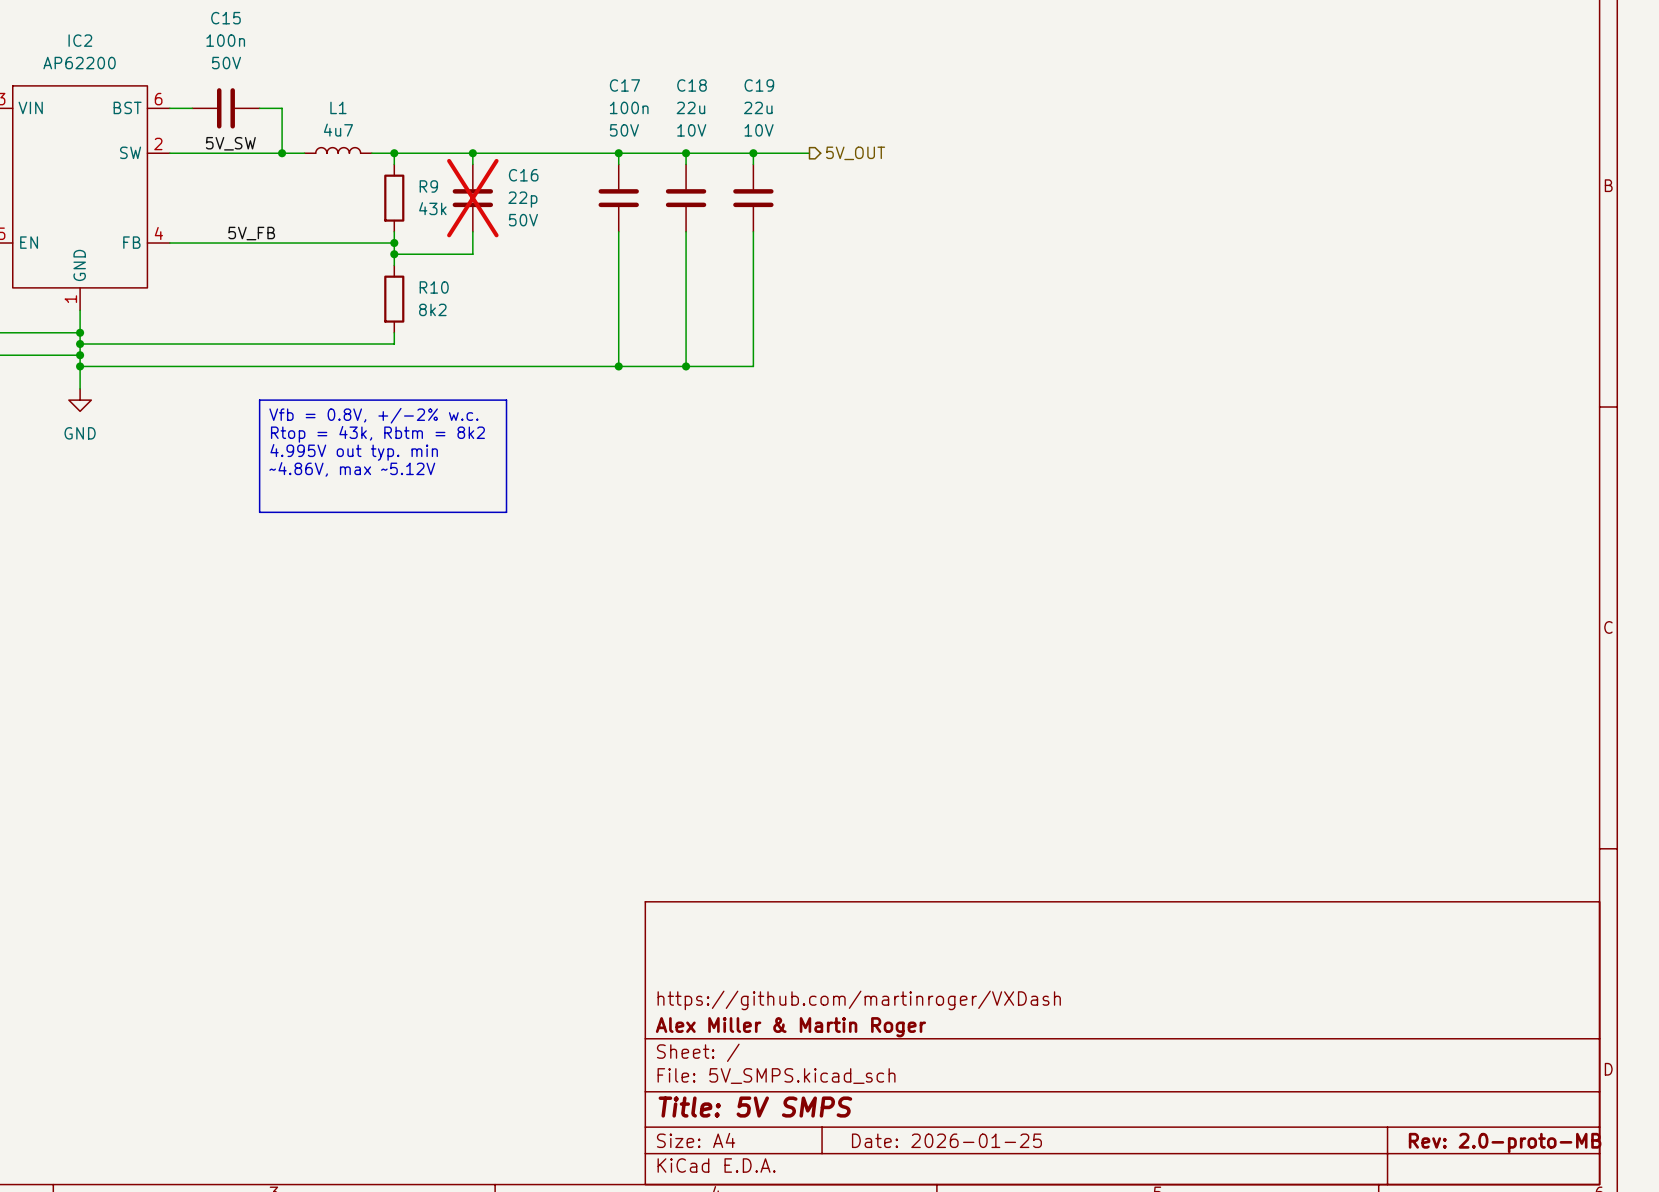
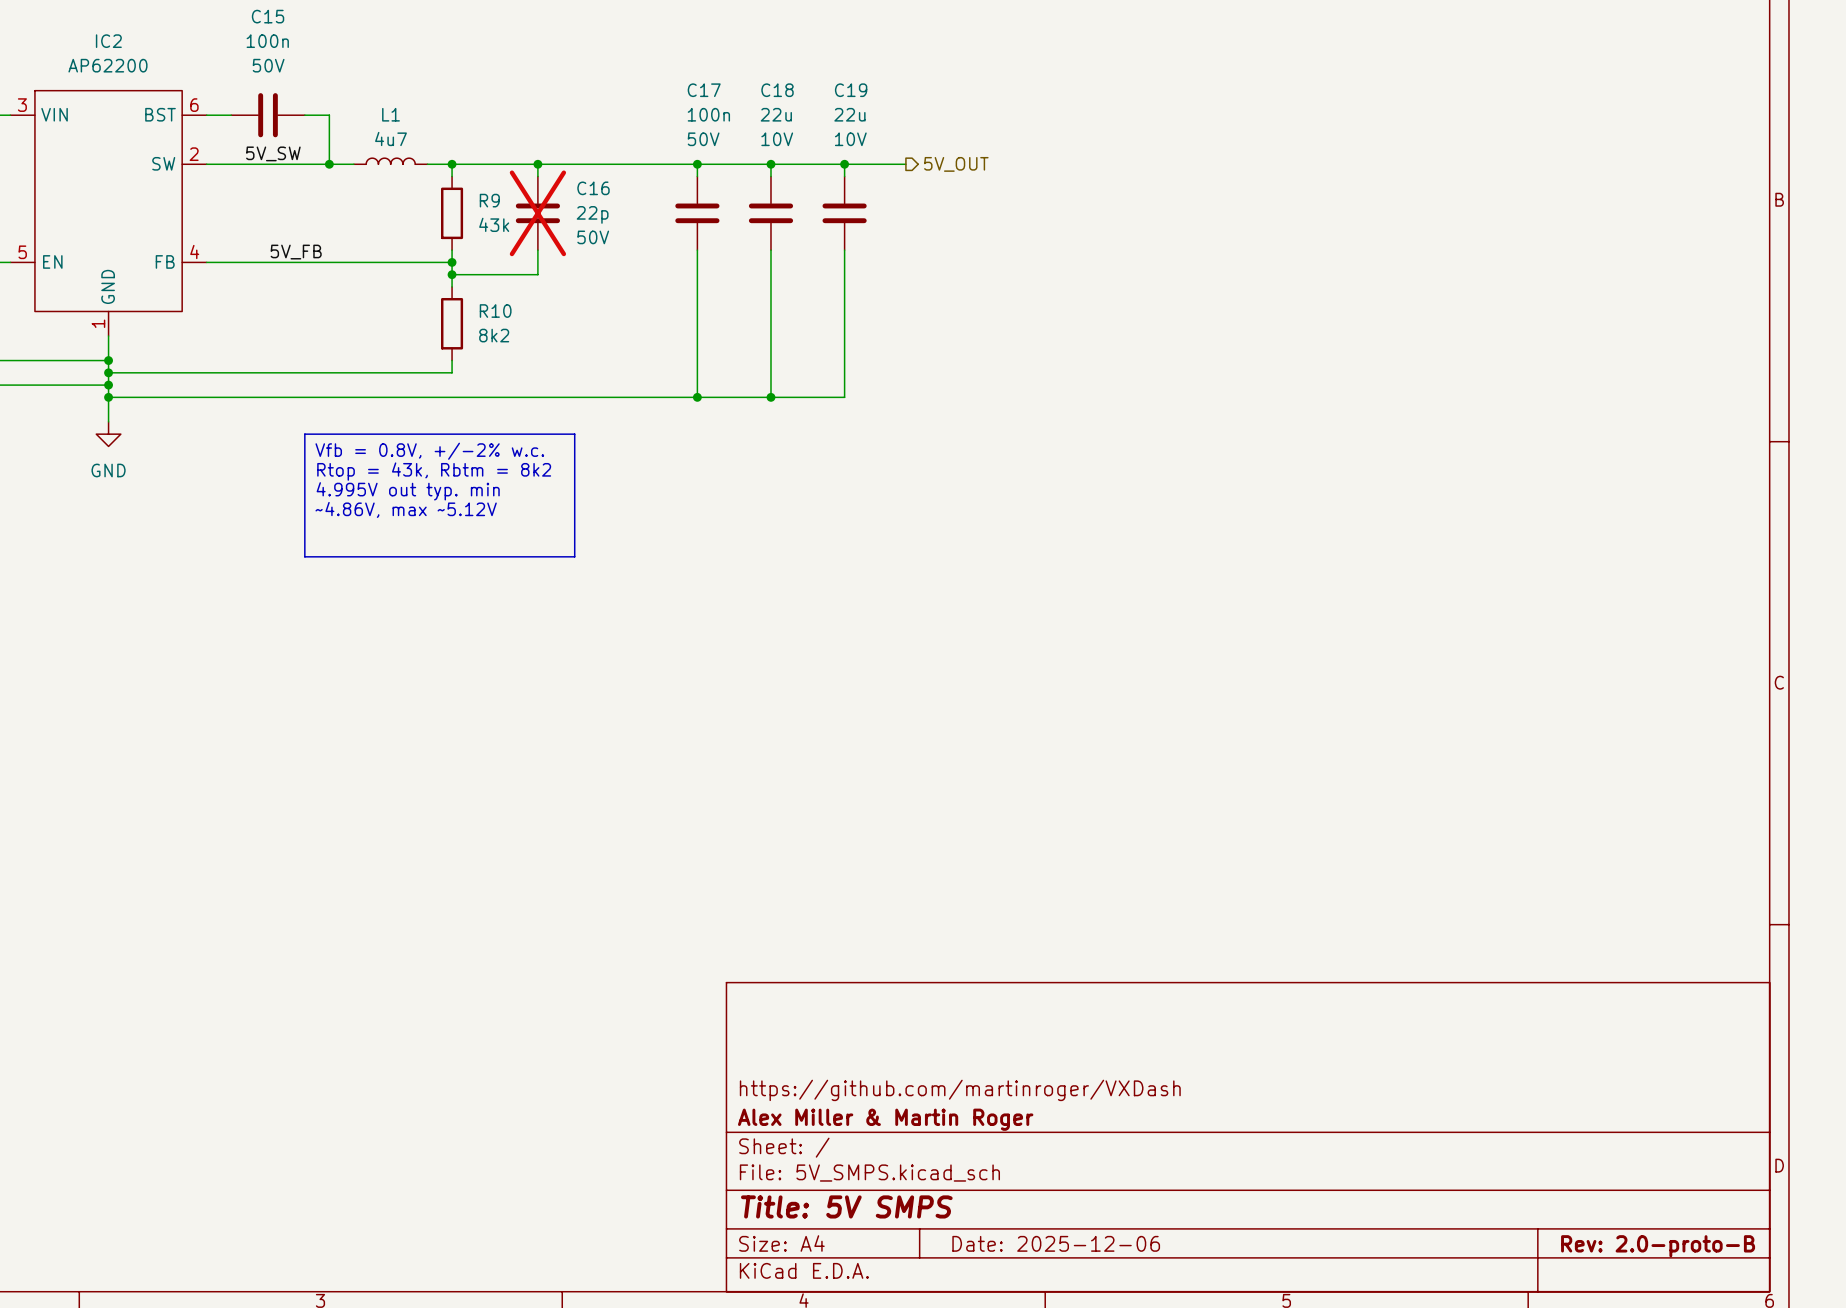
title block: Date: 2026-01-25 (946, 1140) -> Date: 2025-12-06 (1056, 1243)
title block: Rev: 2.0-proto-MB (1505, 1142) -> Rev: 2.0-proto-B (1658, 1246)

